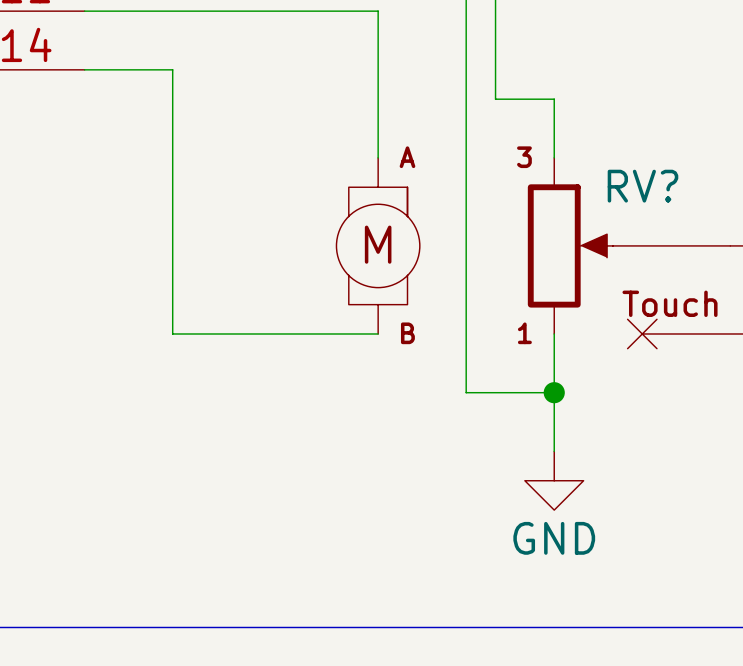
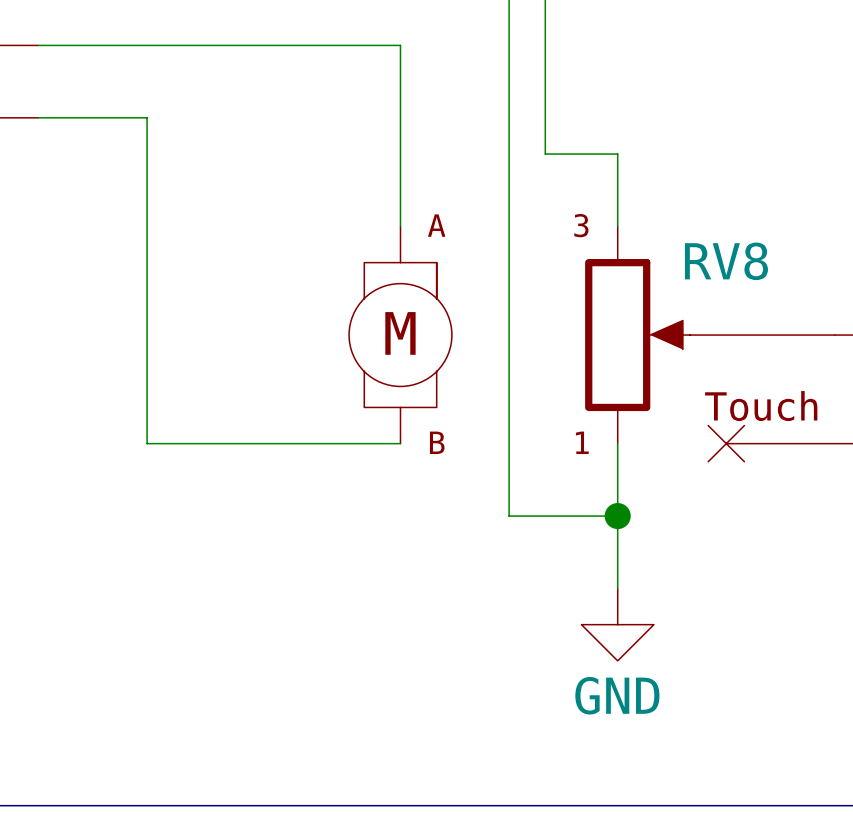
RV? name: RV? (642, 186) -> RV8 (726, 261)

